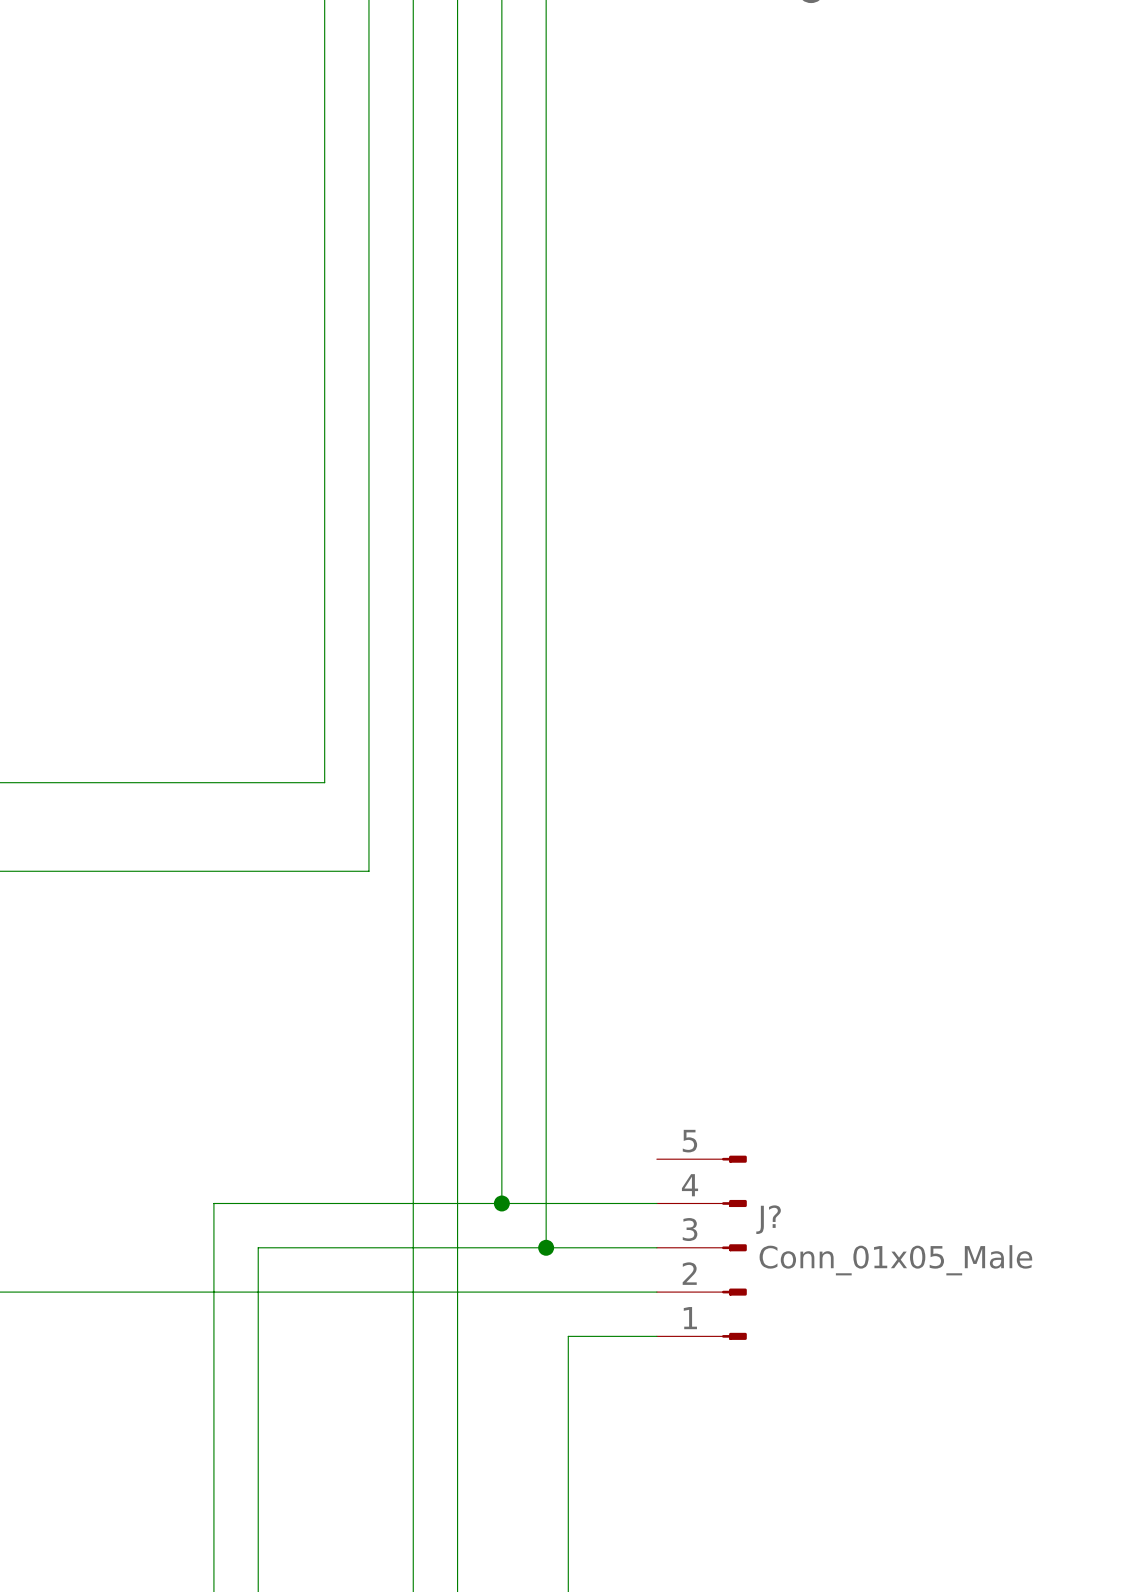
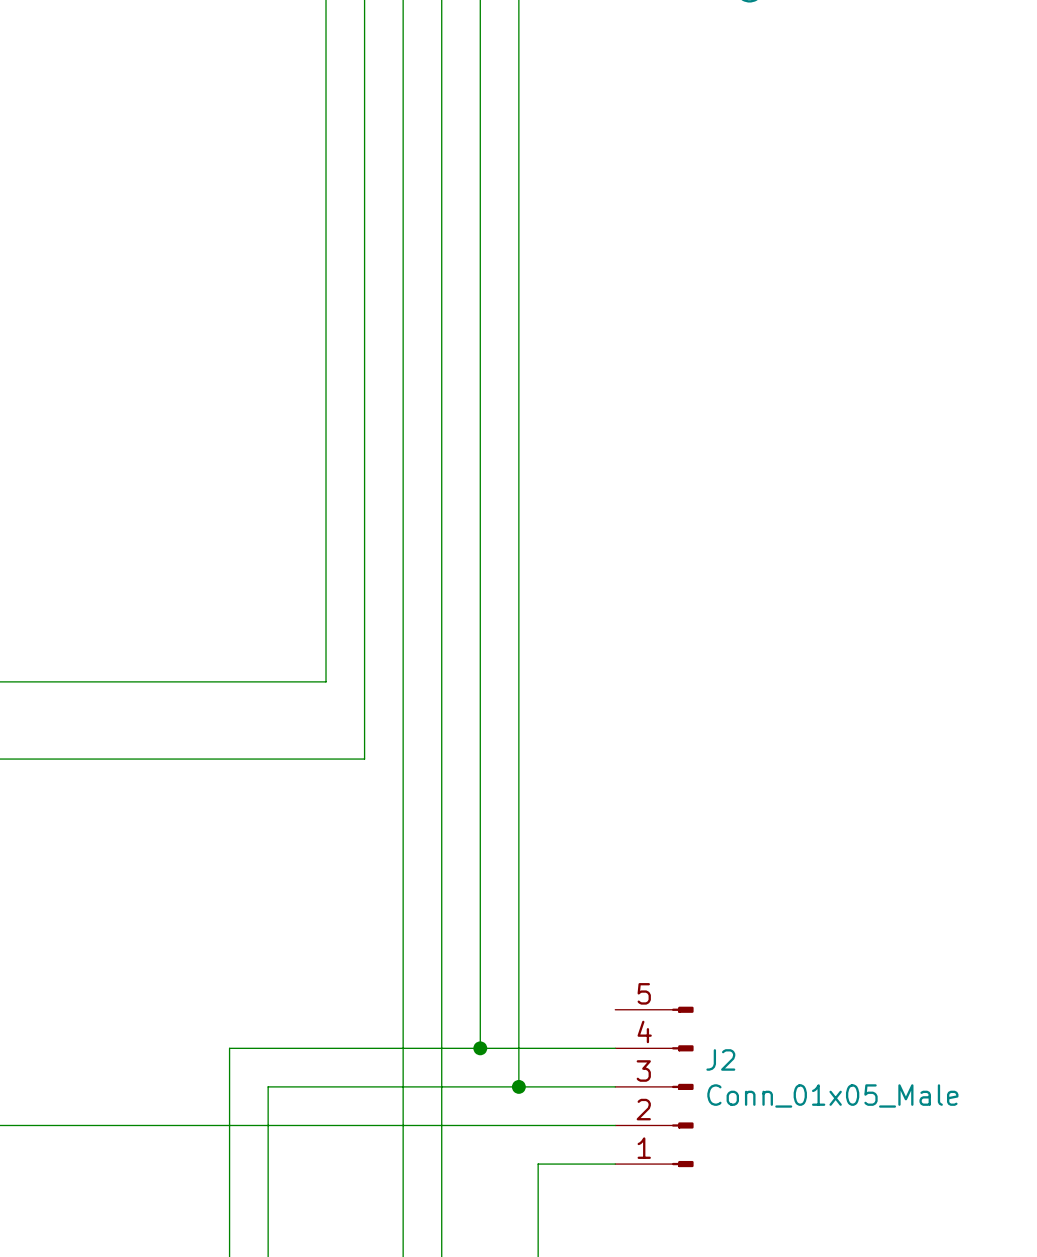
J? name: J? (768, 1219) -> J2 (720, 1059)

